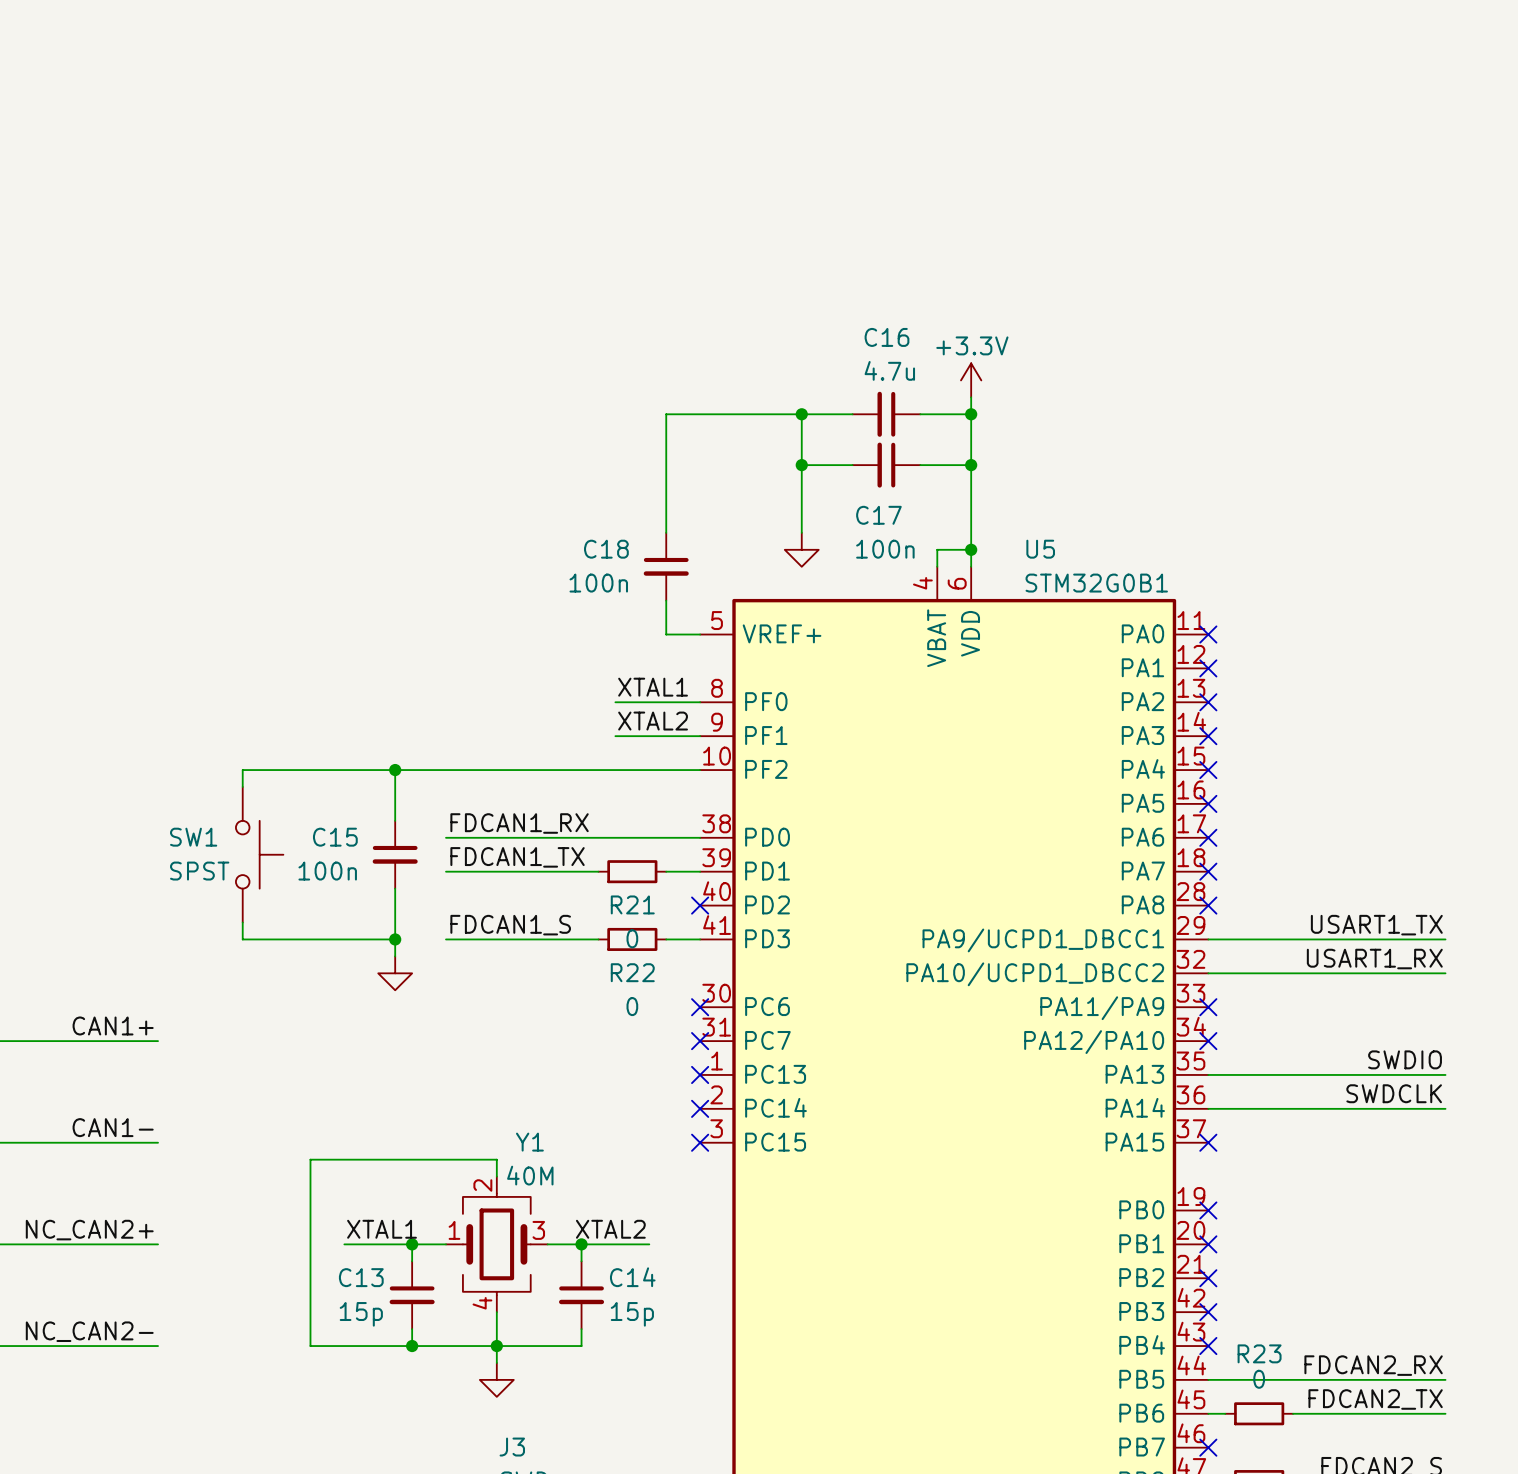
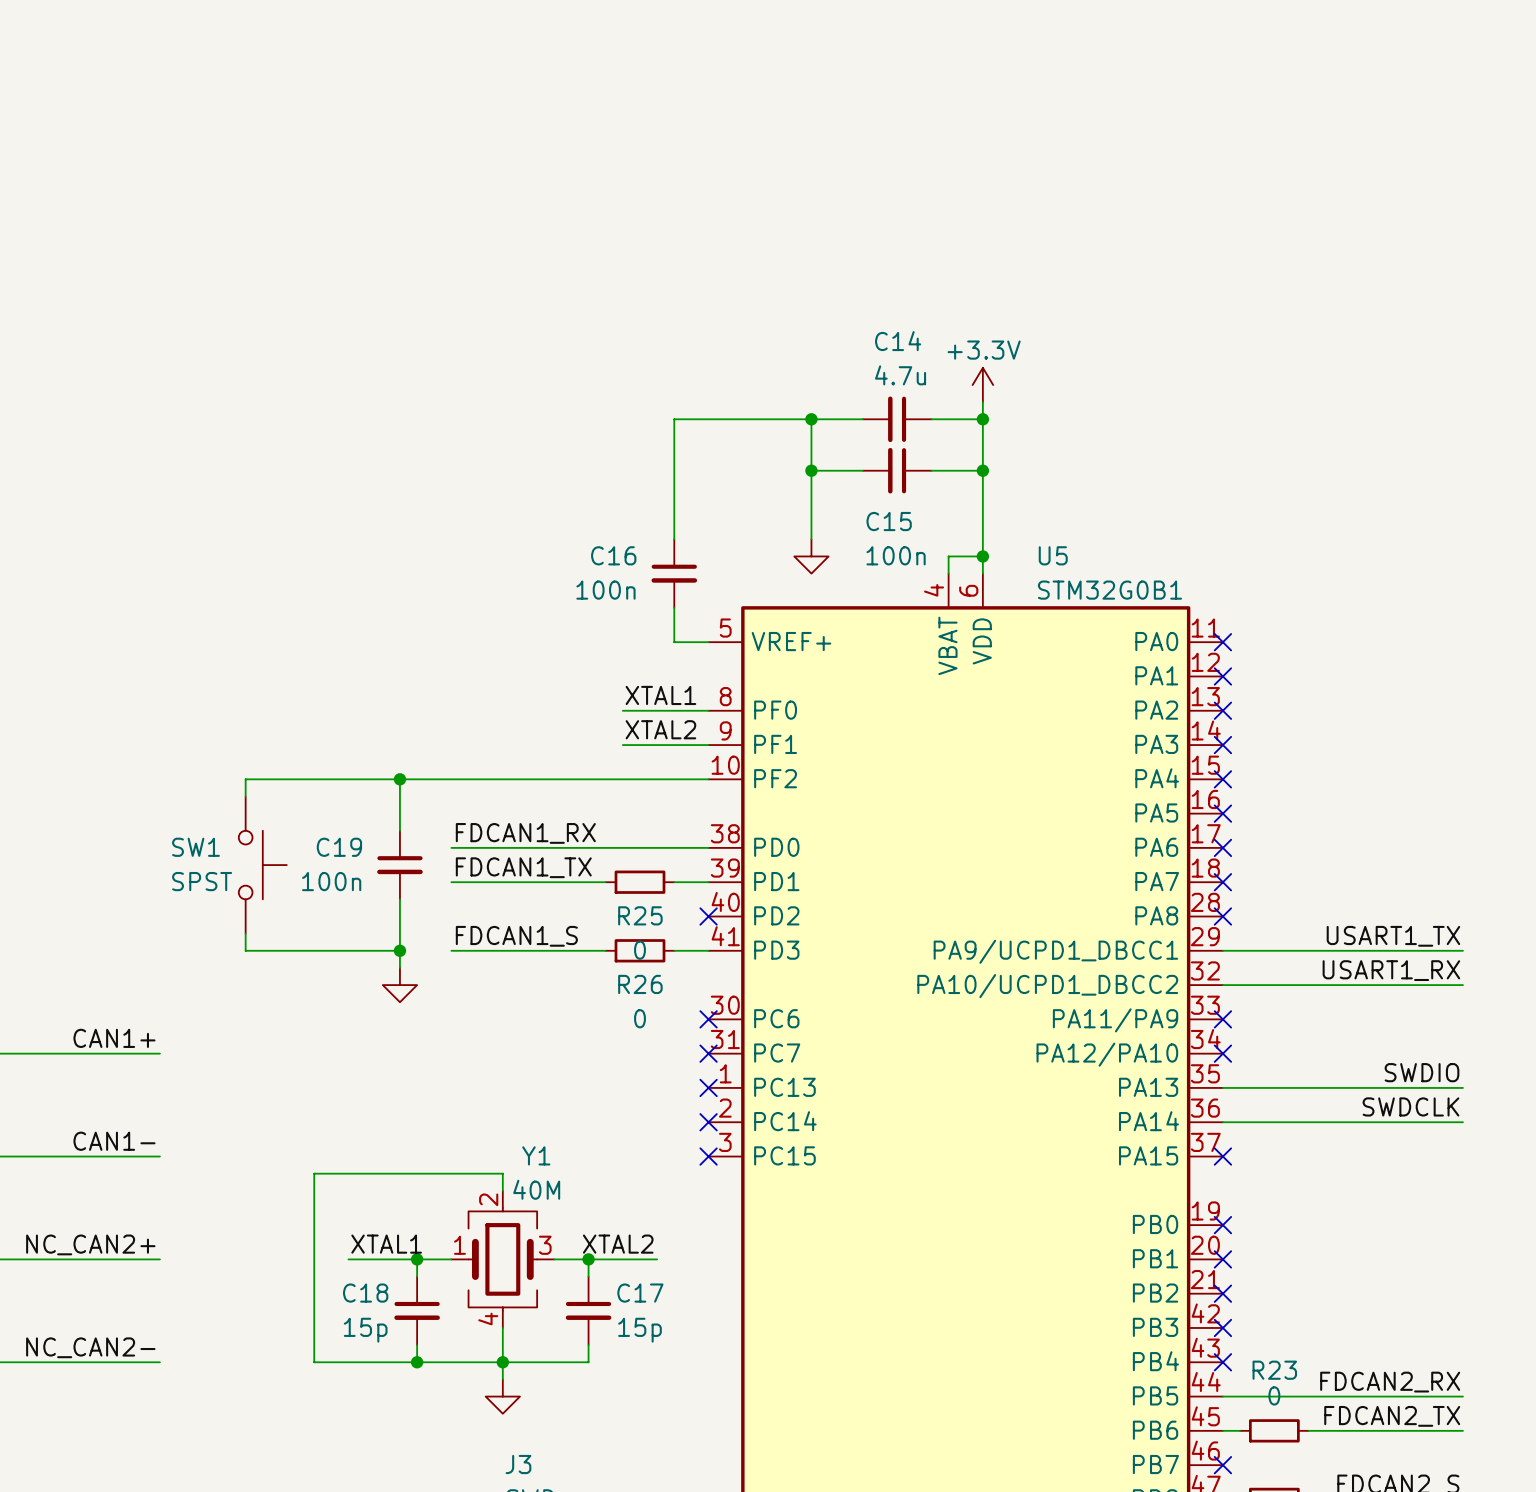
C16 name: C16 (887, 337) -> C14 (898, 341)
C17 name: C17 (878, 515) -> C15 (889, 521)
C18 name: C18 (606, 549) -> C16 (613, 555)
C15 name: C15 (335, 837) -> C19 (339, 847)
R21 name: R21 (632, 904) -> R25 (640, 915)
R22 name: R22 (632, 972) -> R26 (640, 984)
C13 name: C13 (361, 1277) -> C18 (365, 1293)
C14 name: C14 (632, 1277) -> C17 (640, 1293)

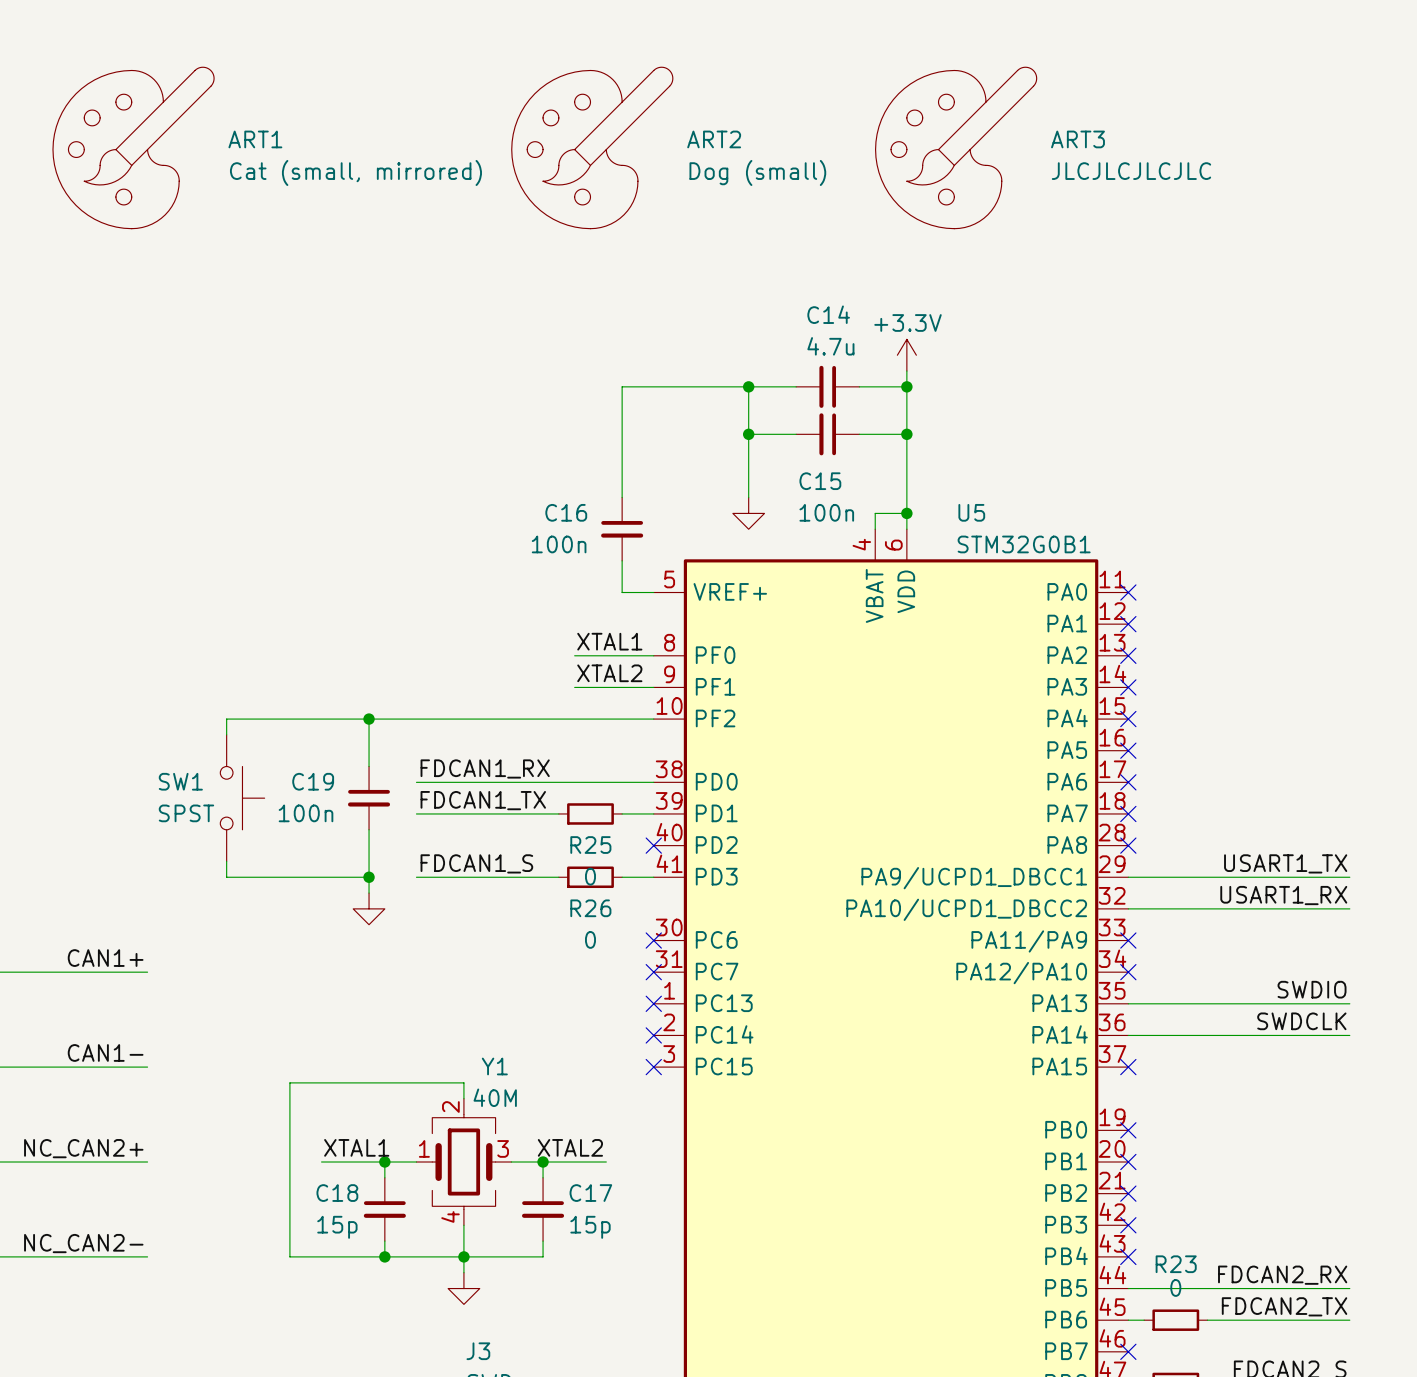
ART1: none -> Cat (small, mirrored) (133, 147)
ART2: none -> Dog (small) (592, 147)
ART3: none -> JLCJLCJLCJLC (956, 147)

